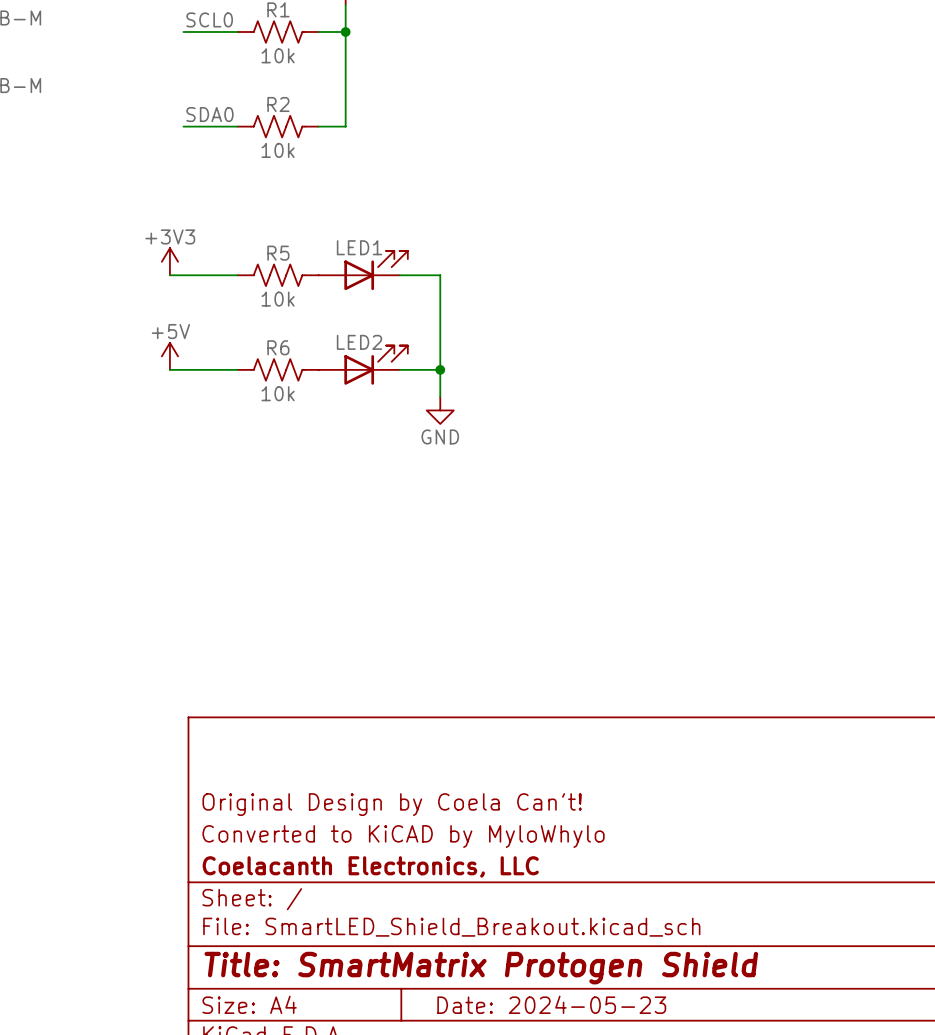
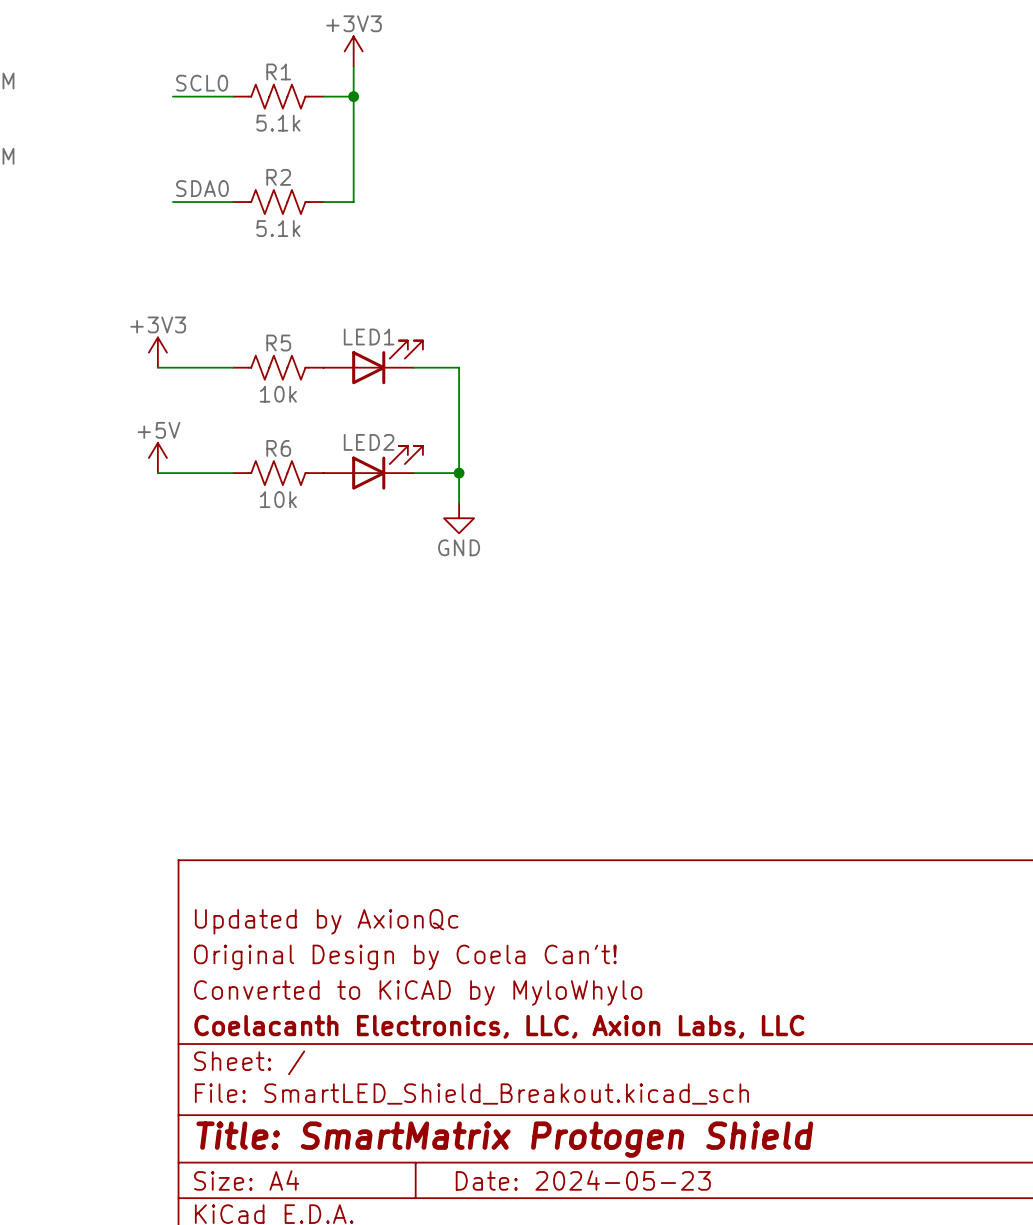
R1 value: 10k (278, 55) -> 5.1k (278, 123)
R2 value: 10k (278, 150) -> 5.1k (278, 228)
title block: none -> Updated by AxionQc (326, 921)
title block: Coelacanth Electronics, LLC (370, 866) -> Coelacanth Electronics, LLC, Axion Labs, LLC (499, 1026)

